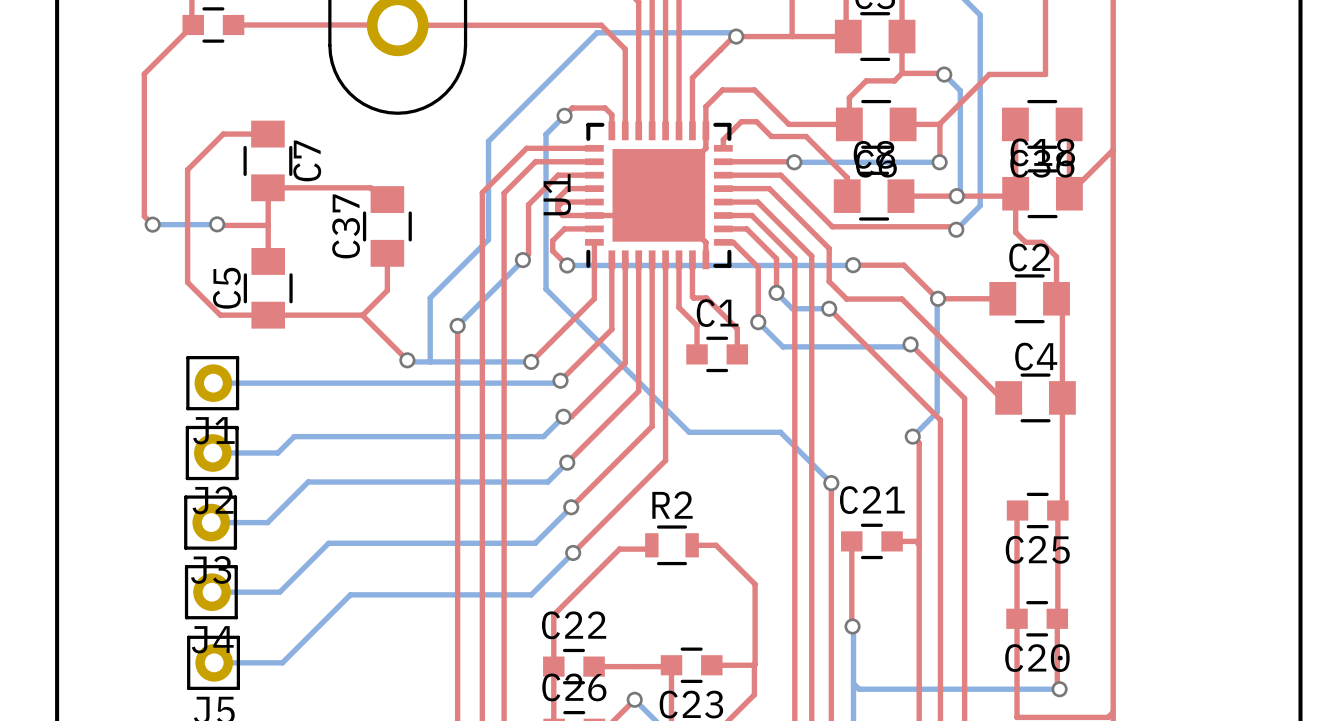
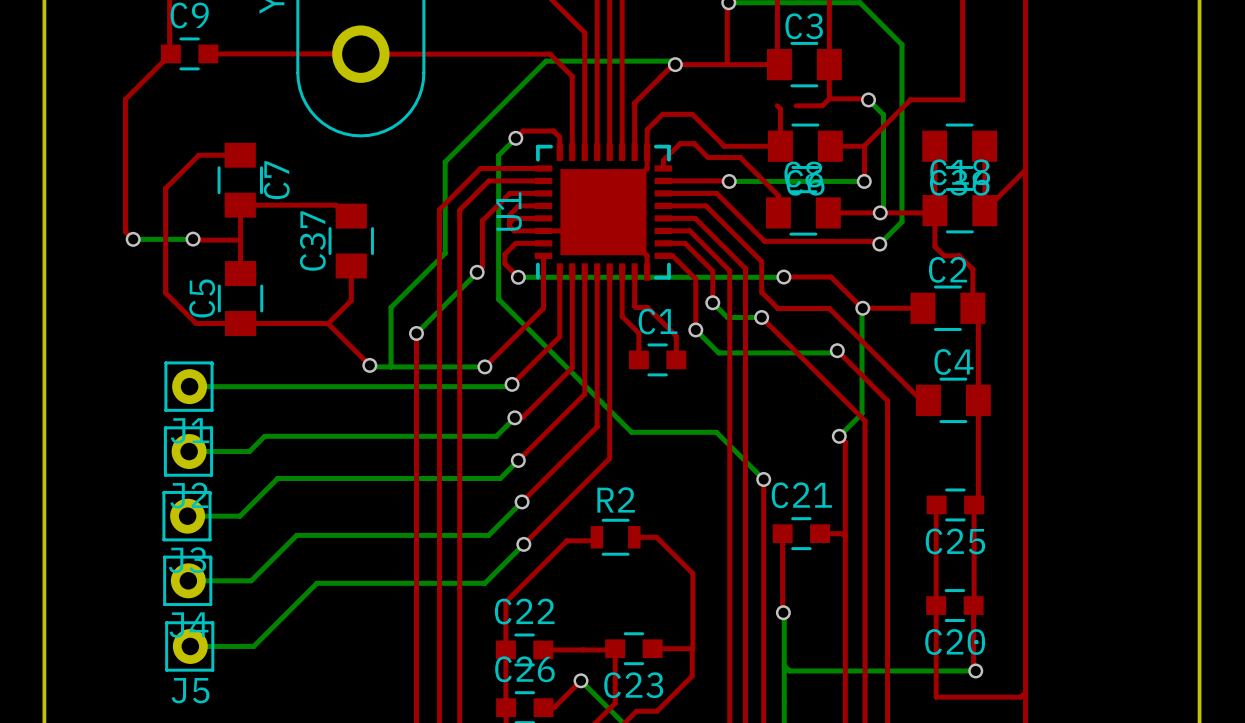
top track: (866, 80) (849, 97) -> (777, 105) (780, 108) (780, 121)

